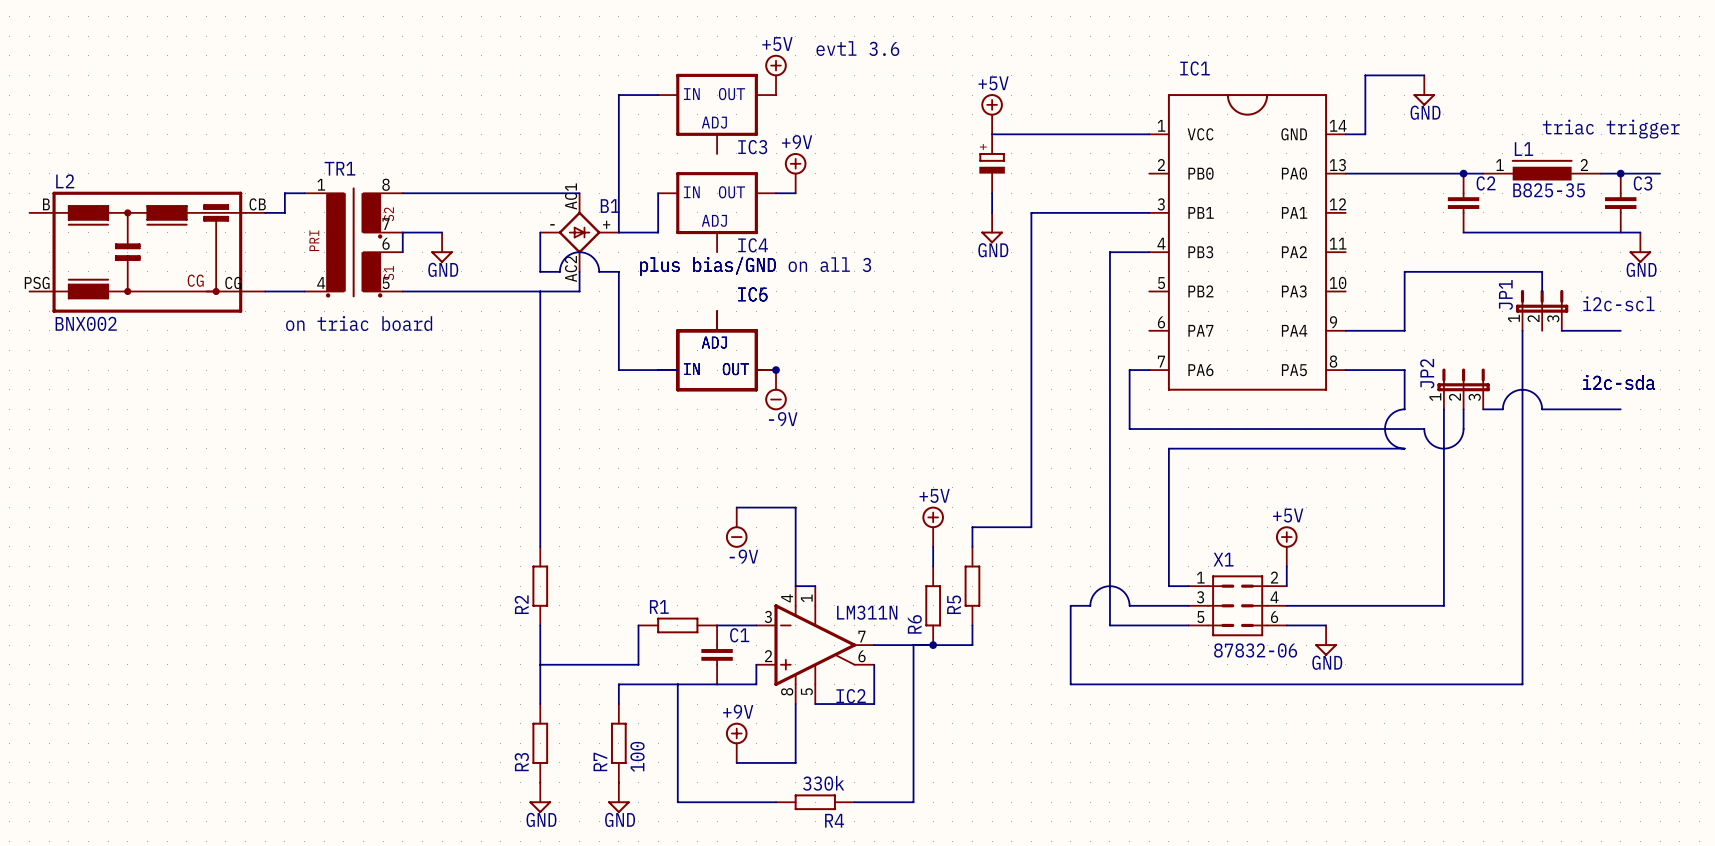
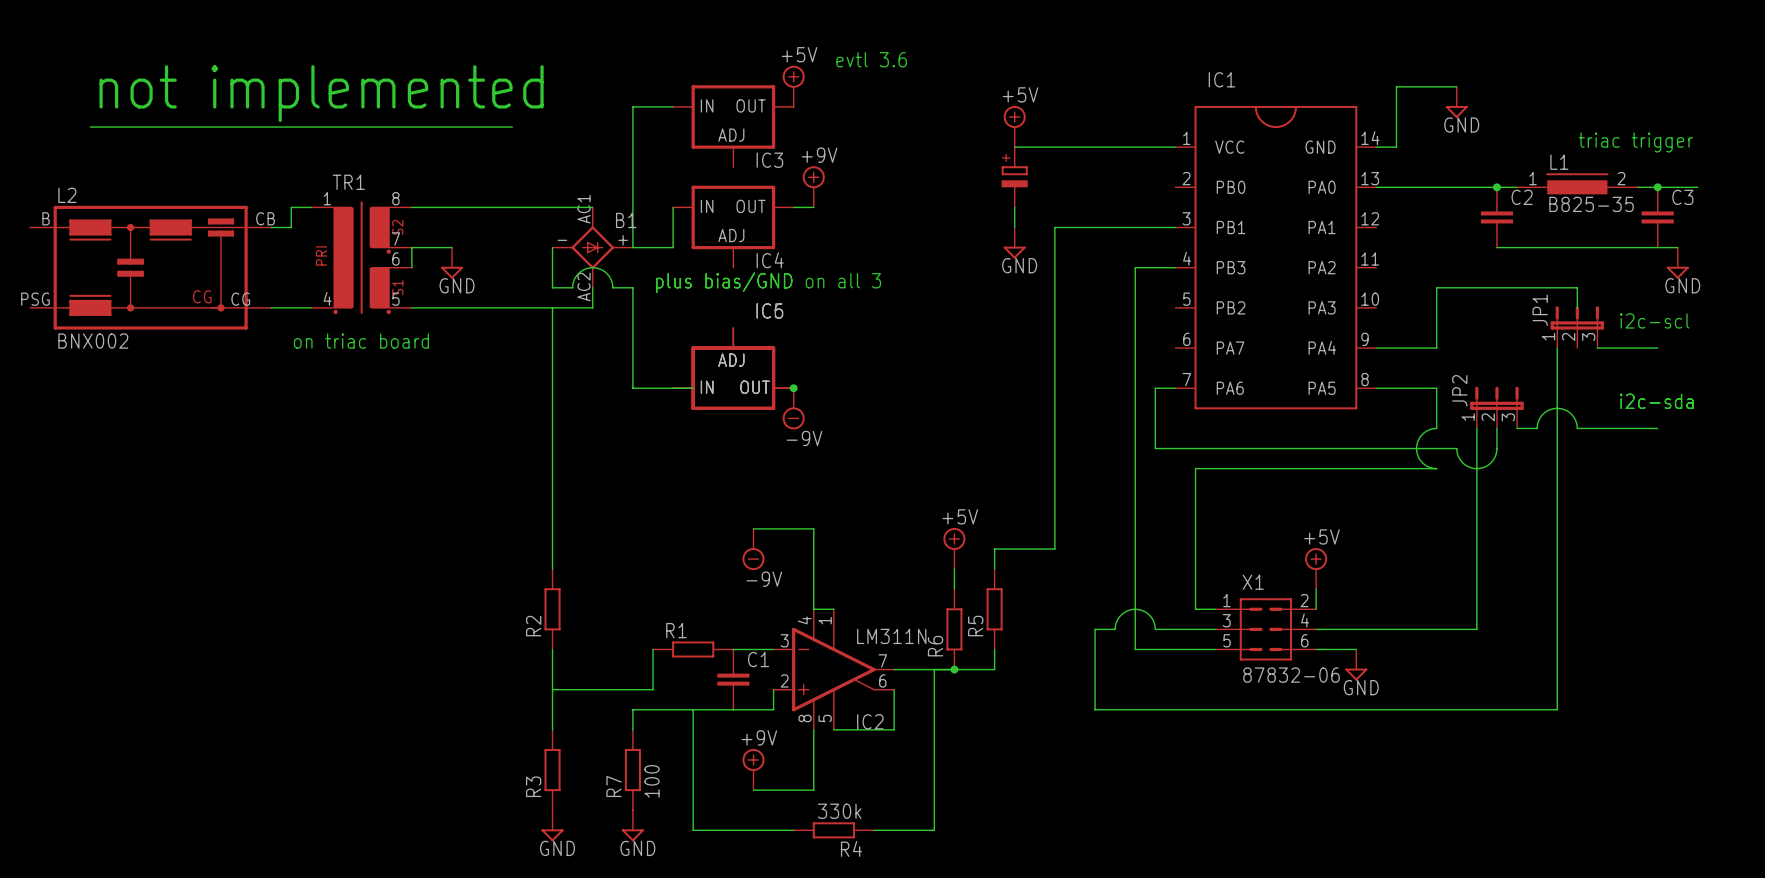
text: none -> not implemented (321, 93)
wire: none -> (90, 127) (512, 127)

